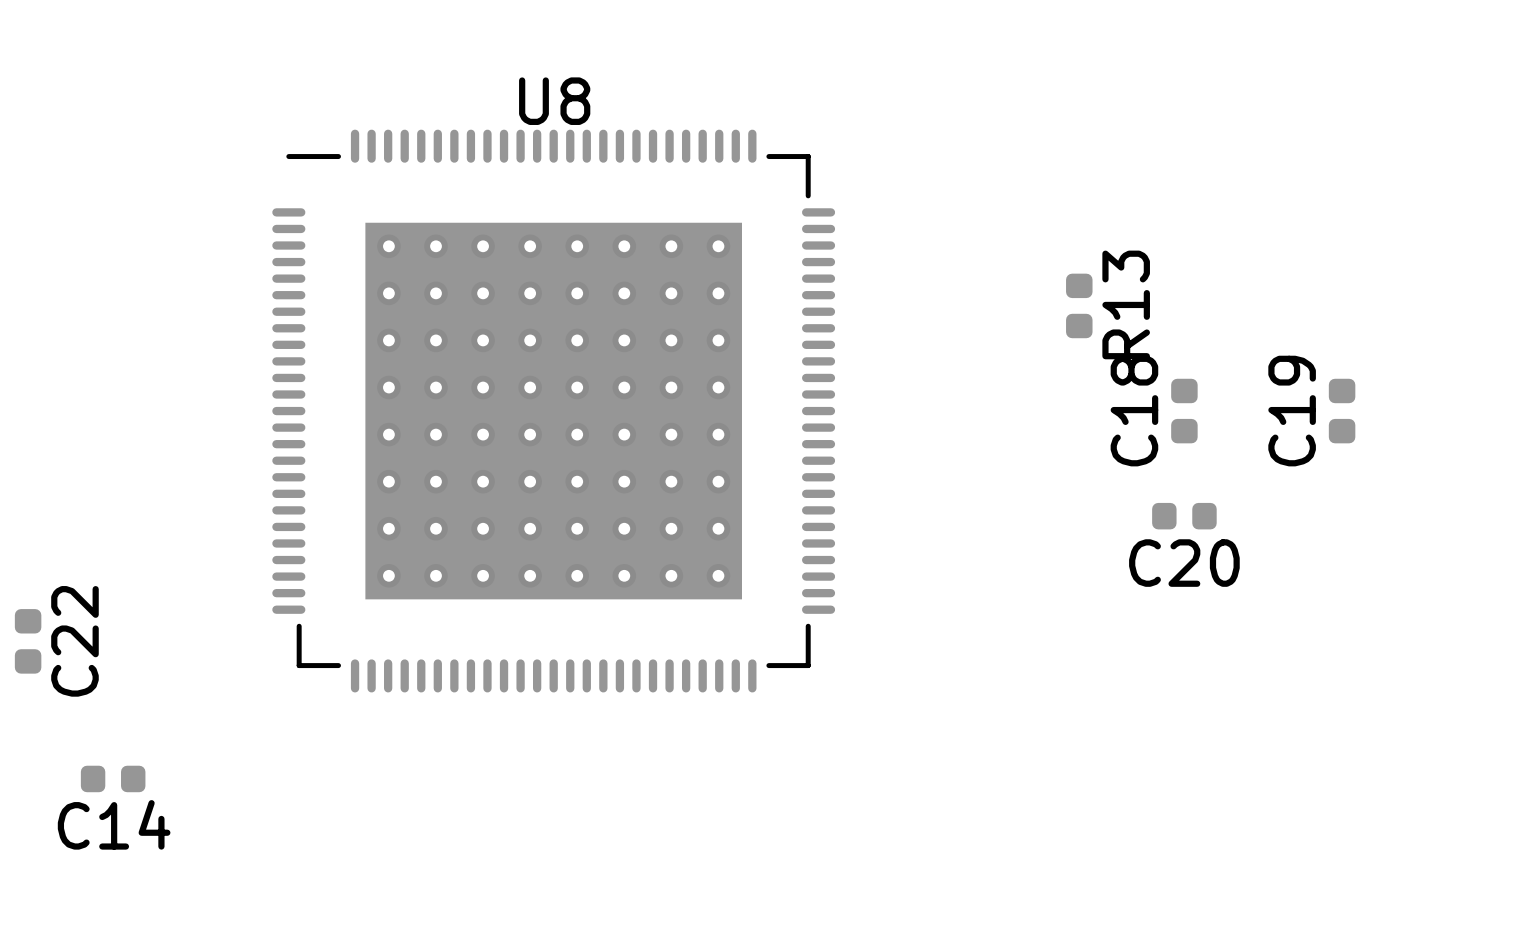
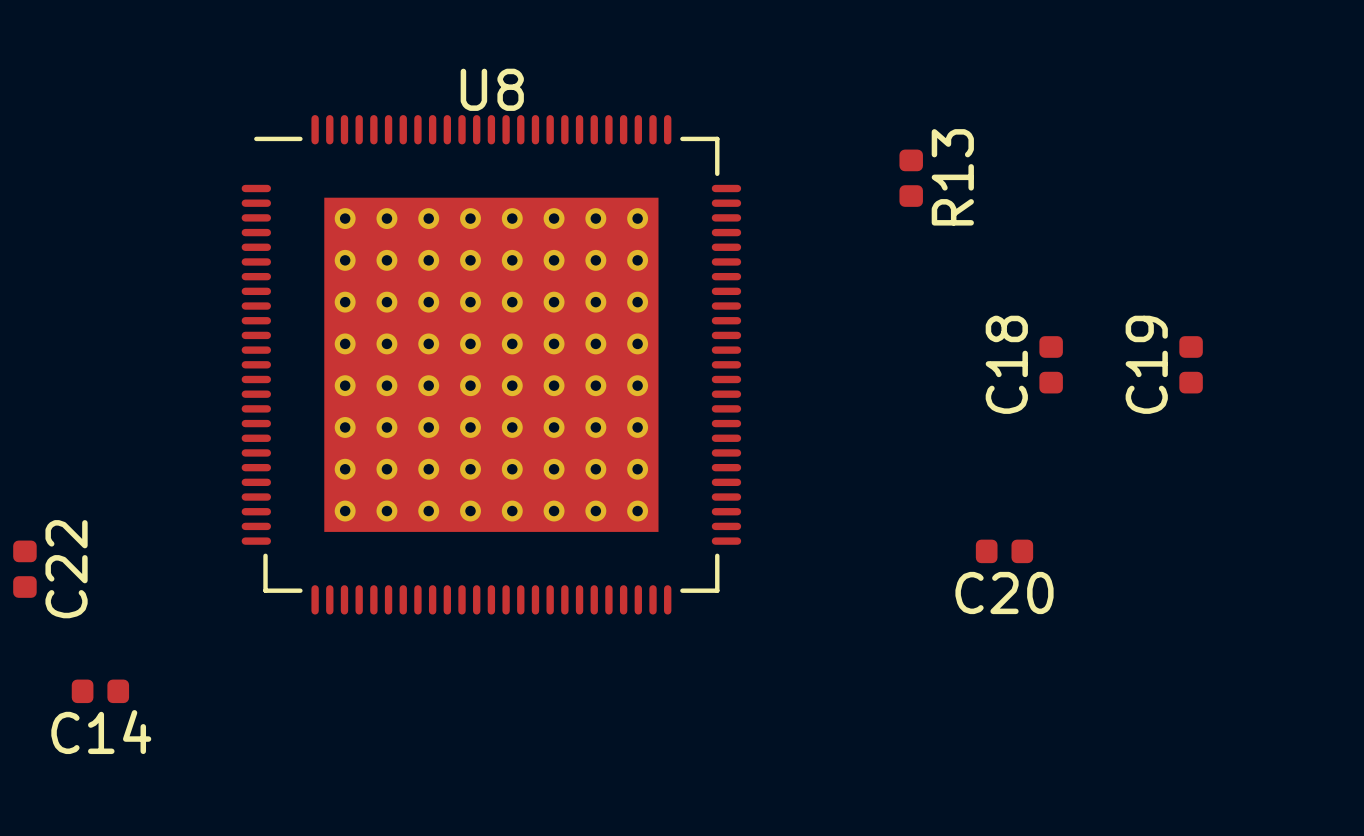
R13 position: (1079, 305) -> (911, 178)
C20 position: (1184, 516) -> (1004, 551)

